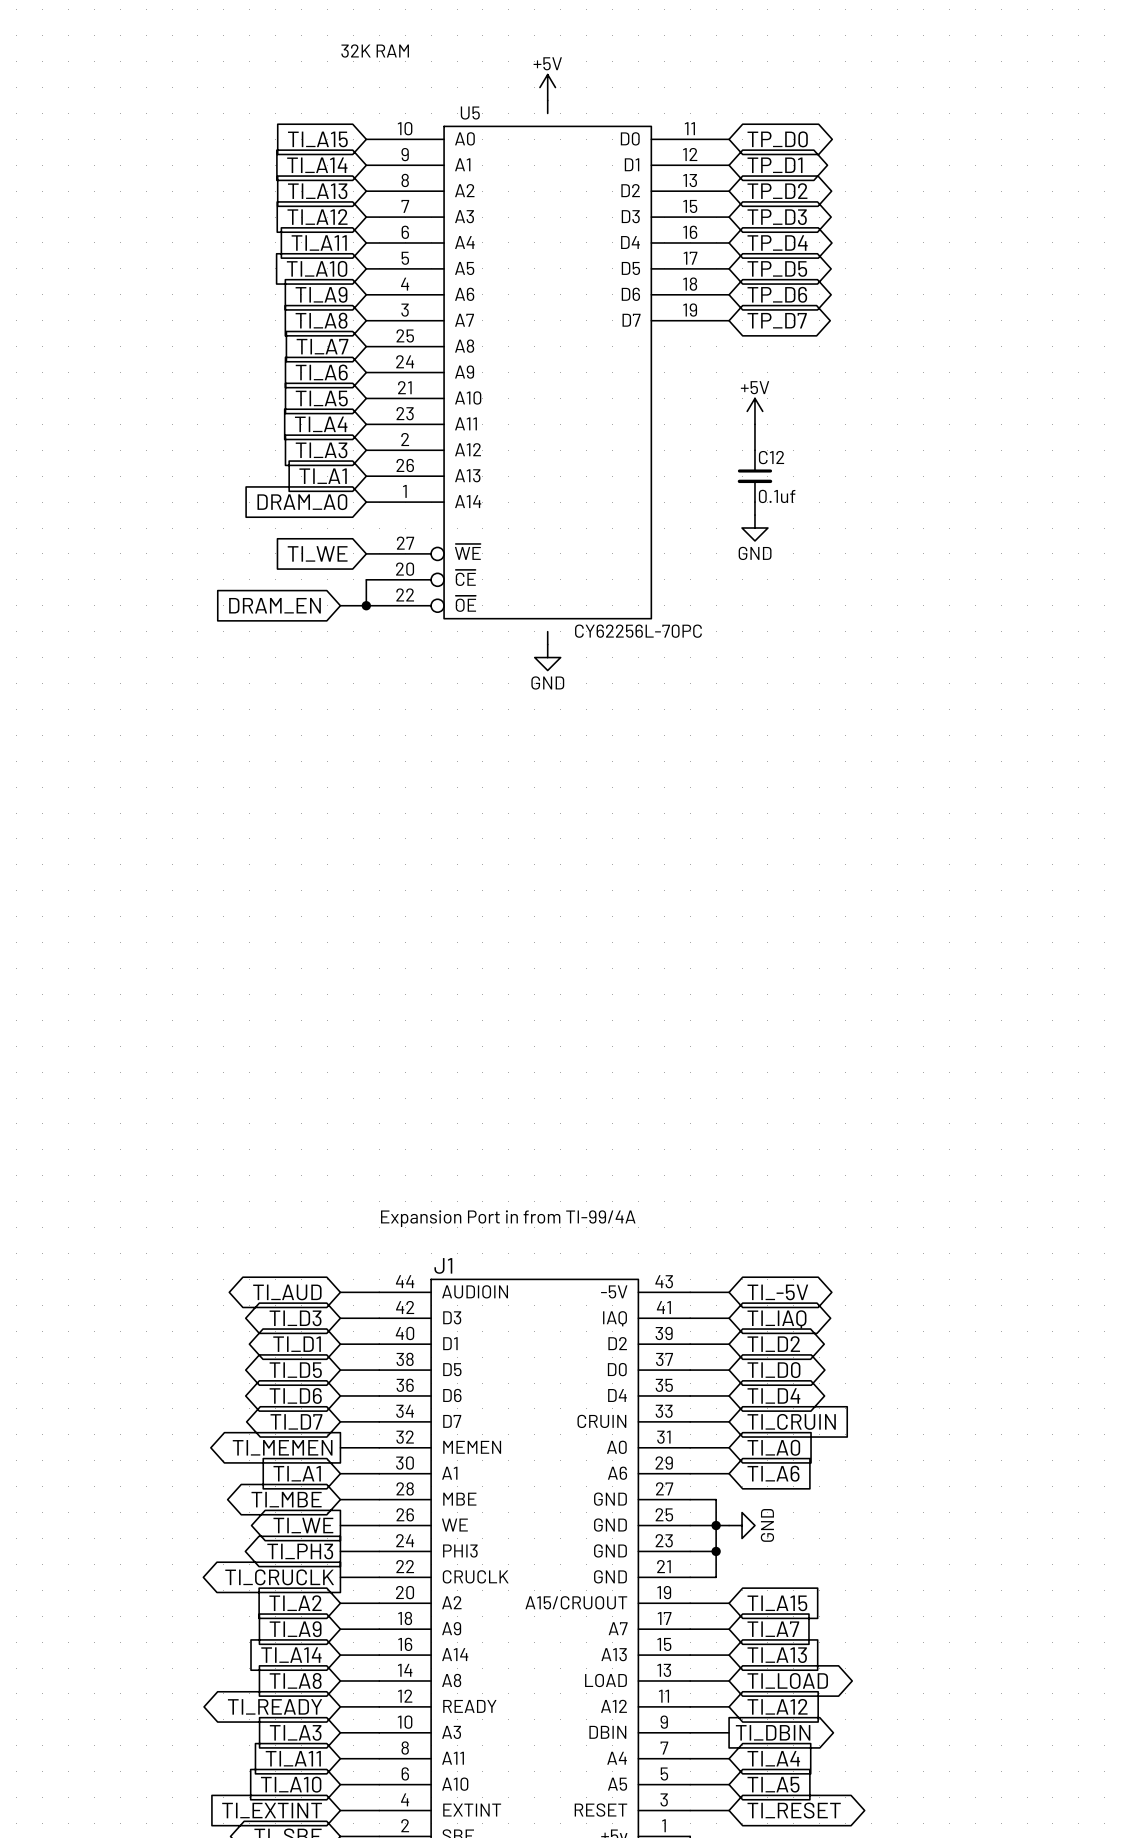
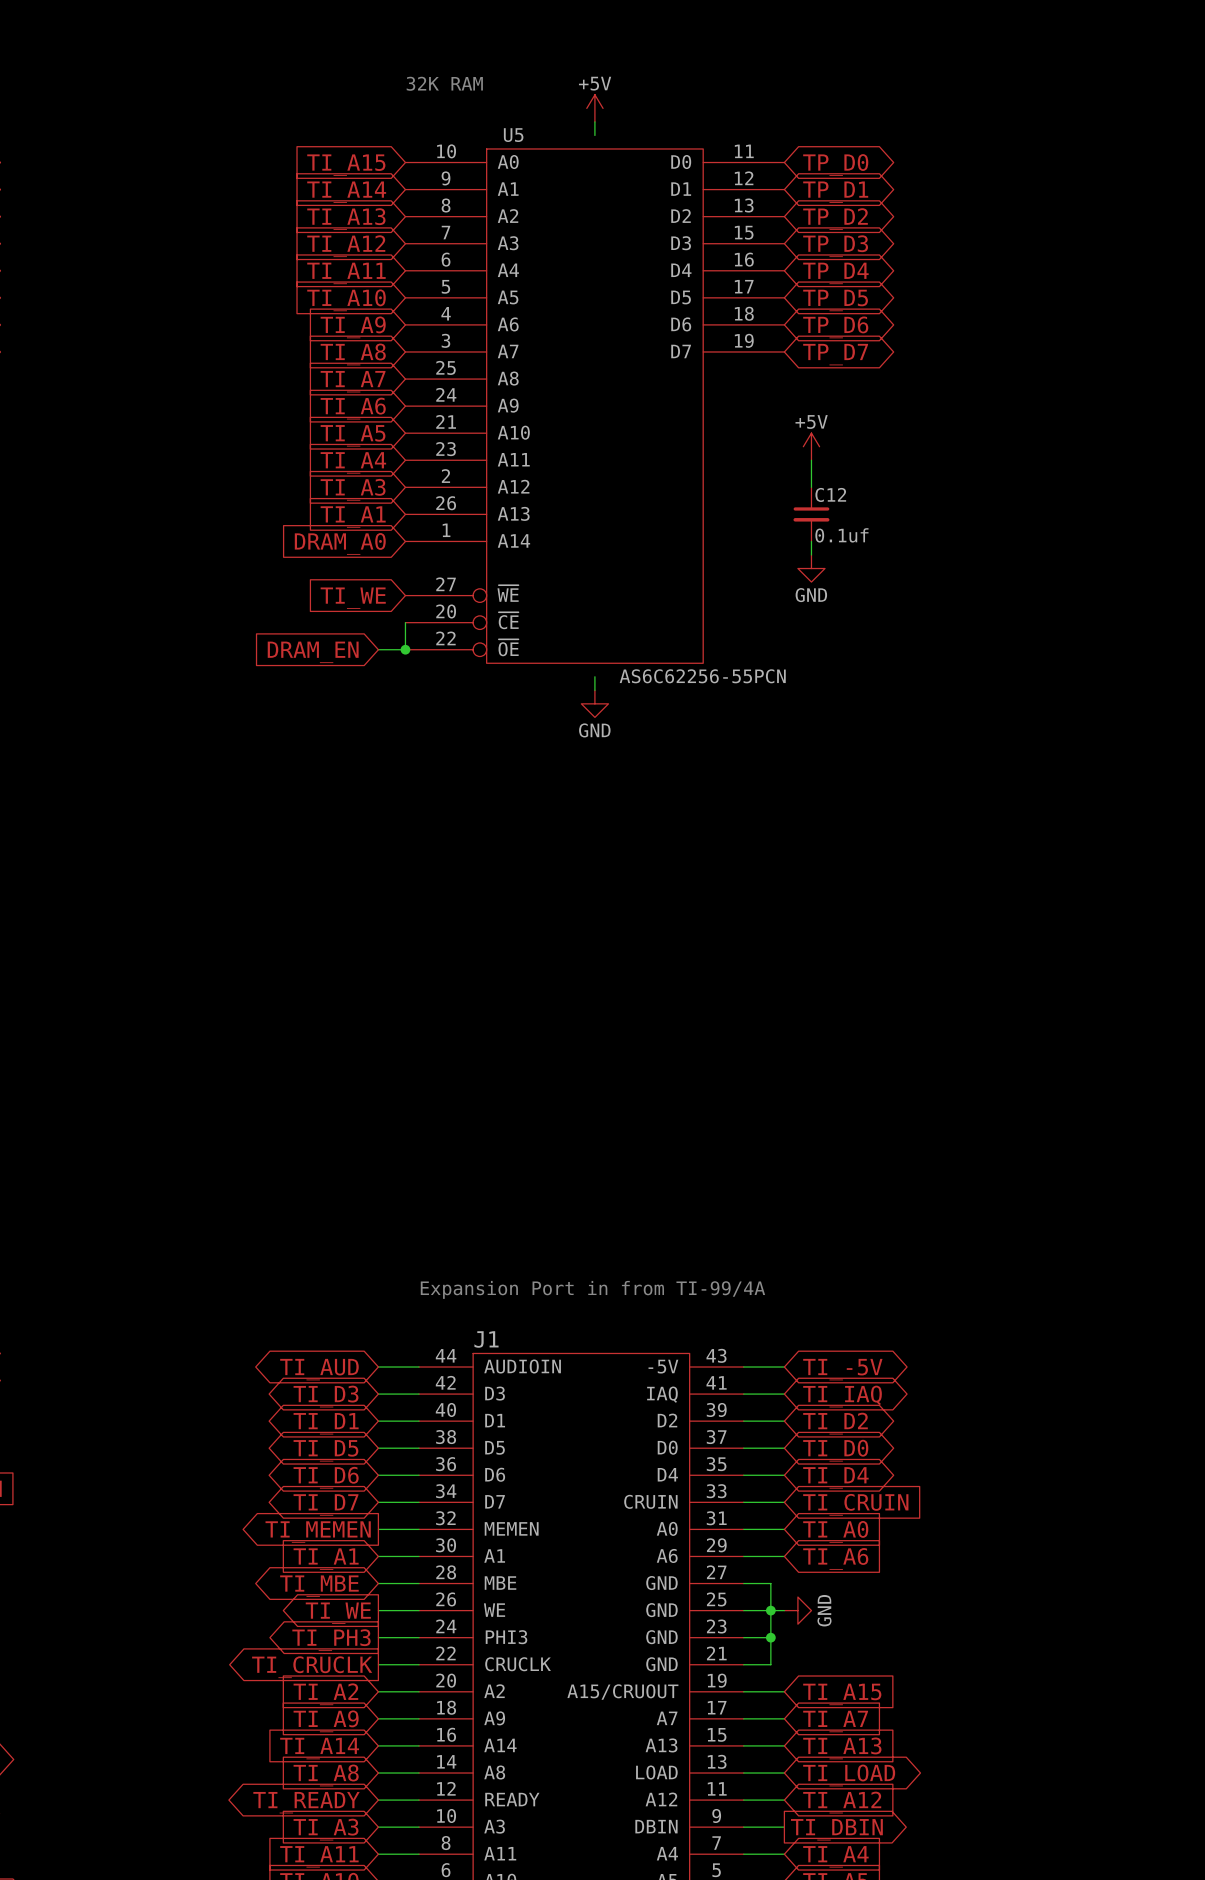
text position: 32K RAM (375, 51) -> 32K RAM (444, 83)
U5 value: CY62256L-70PC (638, 631) -> AS6C62256-55PCN (702, 676)

